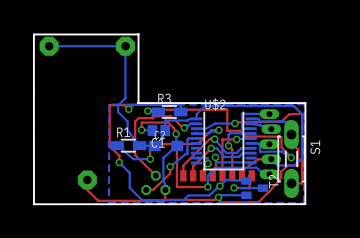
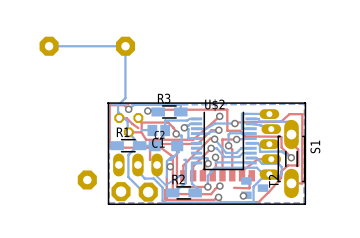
board edge: (138, 33) (138, 103) -> (108, 103) (138, 103)
board edge: (138, 34) (33, 34) (34, 204) (108, 204) -> (108, 103) (108, 204)
top track: none -> (219, 116) (193, 139) (146, 139) (141, 132) (128, 132)
via: none -> (219, 116)
top track: none -> (119, 117) (126, 118) (138, 128)
bottom track: (196, 118) (196, 114) (205, 105) (293, 105) (302, 114) (302, 158) (294, 165) (277, 165) (271, 159) -> none
top track: (184, 127) (171, 116) (138, 117) (135, 121) (135, 155) (155, 175) -> none
via: (141, 130) -> none
bottom track: (176, 133) (177, 145) (163, 157) (165, 190) -> none
bottom track: none -> (177, 134) (181, 135) (181, 145) (178, 152) (169, 159)
bottom track: (188, 138) (187, 154) (170, 166) -> (188, 138) (188, 128) (184, 128)
bottom track: (117, 145) (133, 159) (150, 159) -> none
bottom track: none -> (142, 145) (137, 145) (128, 155) (128, 177) (143, 191) (148, 192)
top track: (111, 147) (119, 155) (119, 162) -> (111, 147) (160, 147) (172, 156) (172, 194) (211, 194) (217, 187)
bottom track: none -> (173, 156) (166, 161) (166, 176)
bottom track: none -> (251, 158) (256, 158) (261, 163)
via: (150, 159) -> none
bottom track: none -> (184, 159) (186, 159) (185, 183) (172, 192)
bottom track: (119, 162) (129, 172) (129, 187) (142, 200) (183, 200) (188, 195) (209, 195) (219, 186) -> none
via: (119, 162) -> none
bottom track: none -> (196, 162) (191, 164) (191, 183) (197, 189) (195, 192)
bottom track: none -> (261, 163) (278, 163) (281, 167) (281, 174) (277, 178) (261, 178) (253, 186) (253, 202) (165, 202) (162, 200) (162, 187) (153, 178) (144, 178) (137, 170) (137, 164)
part: none -> (137, 164)
bottom track: none -> (157, 164) (157, 176) (165, 185) (181, 175) (177, 176)
top track: (170, 166) (170, 173) (153, 189) (146, 190) -> none
top track: (87, 179) (87, 189) (98, 200) (214, 199) (218, 197) (220, 202) -> (166, 176) (167, 199) (214, 199) (218, 196) (220, 202)
bottom track: (246, 180) (226, 179) (219, 186) -> none
part rotation: 0° (155, 182) -> 180° (128, 125)
part position: (155, 182) -> (128, 125)
bottom track: (234, 187) (262, 188) -> none
via position: (234, 187) -> (243, 195)
part: none -> (121, 191)
part: none -> (148, 192)
R2: none -> (183, 192)
bottom track: (246, 195) (218, 195) (215, 197) (218, 197) -> none

